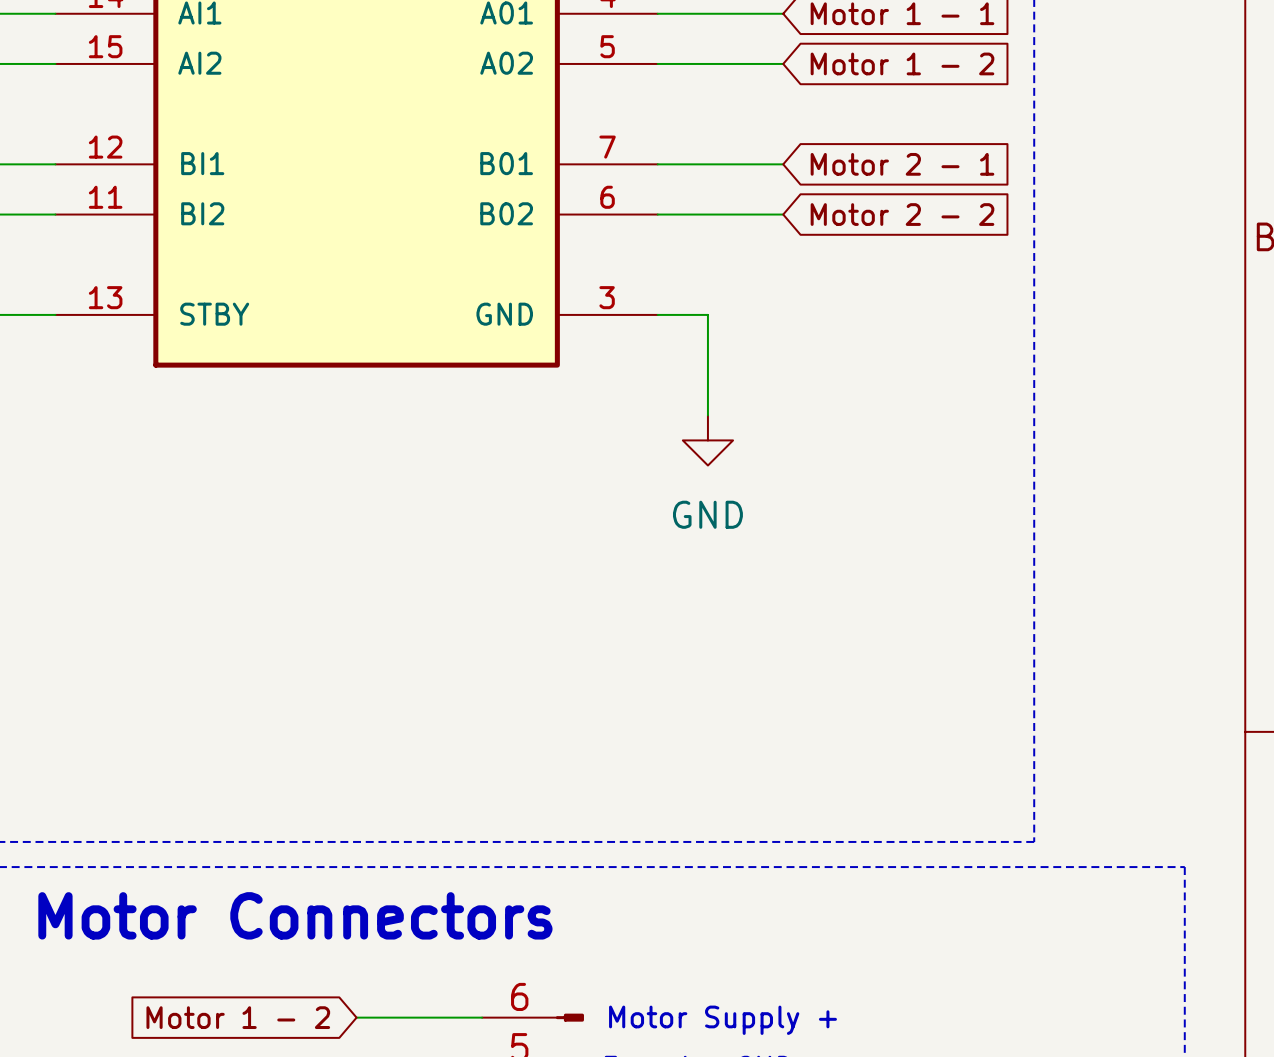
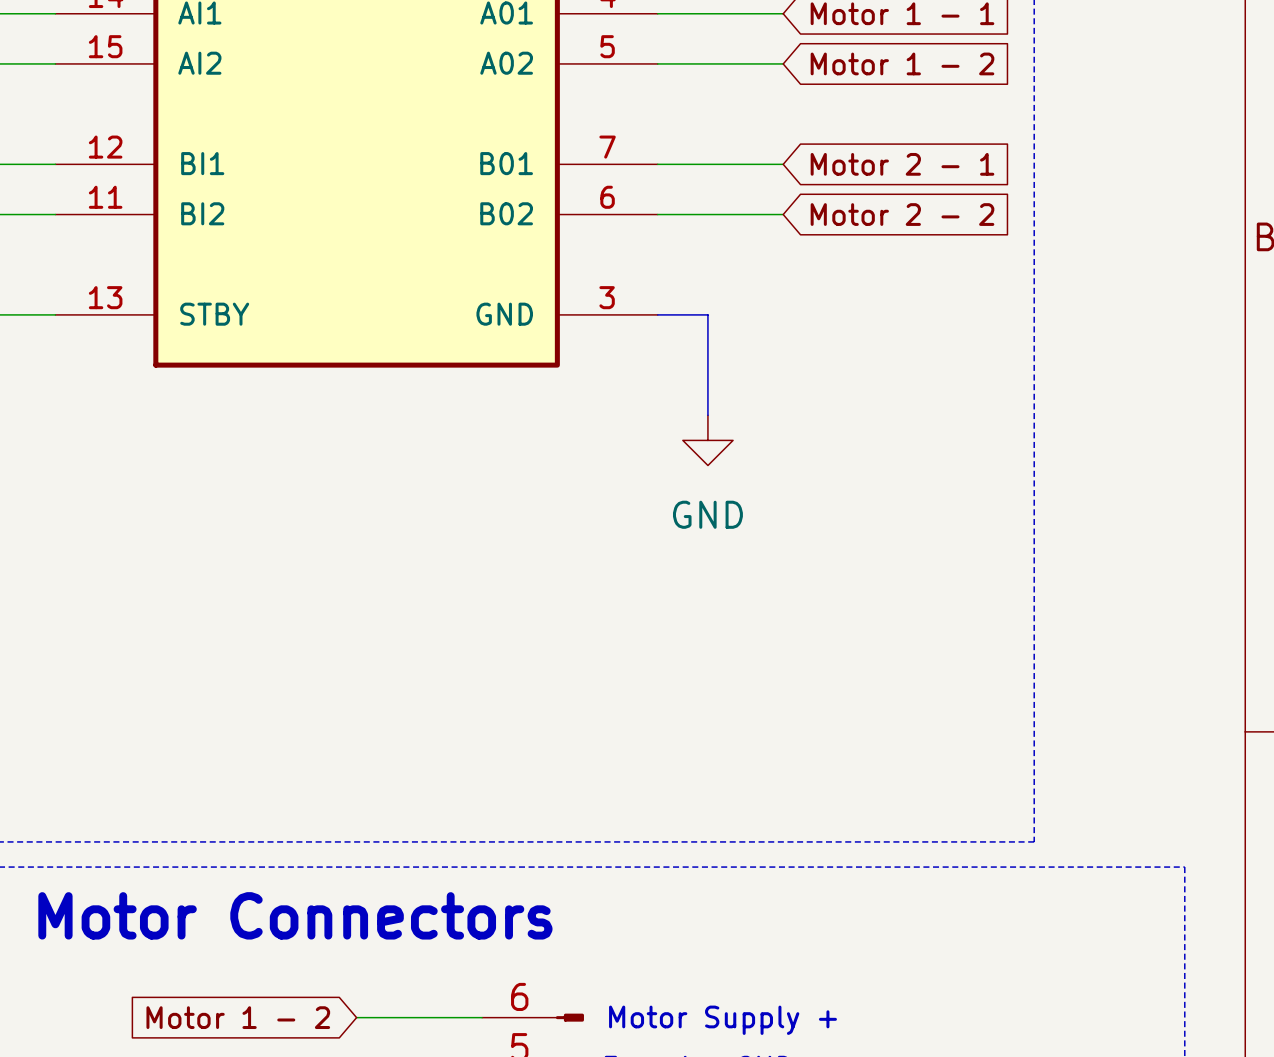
bus: none -> (657, 314) (707, 314) (707, 415)

